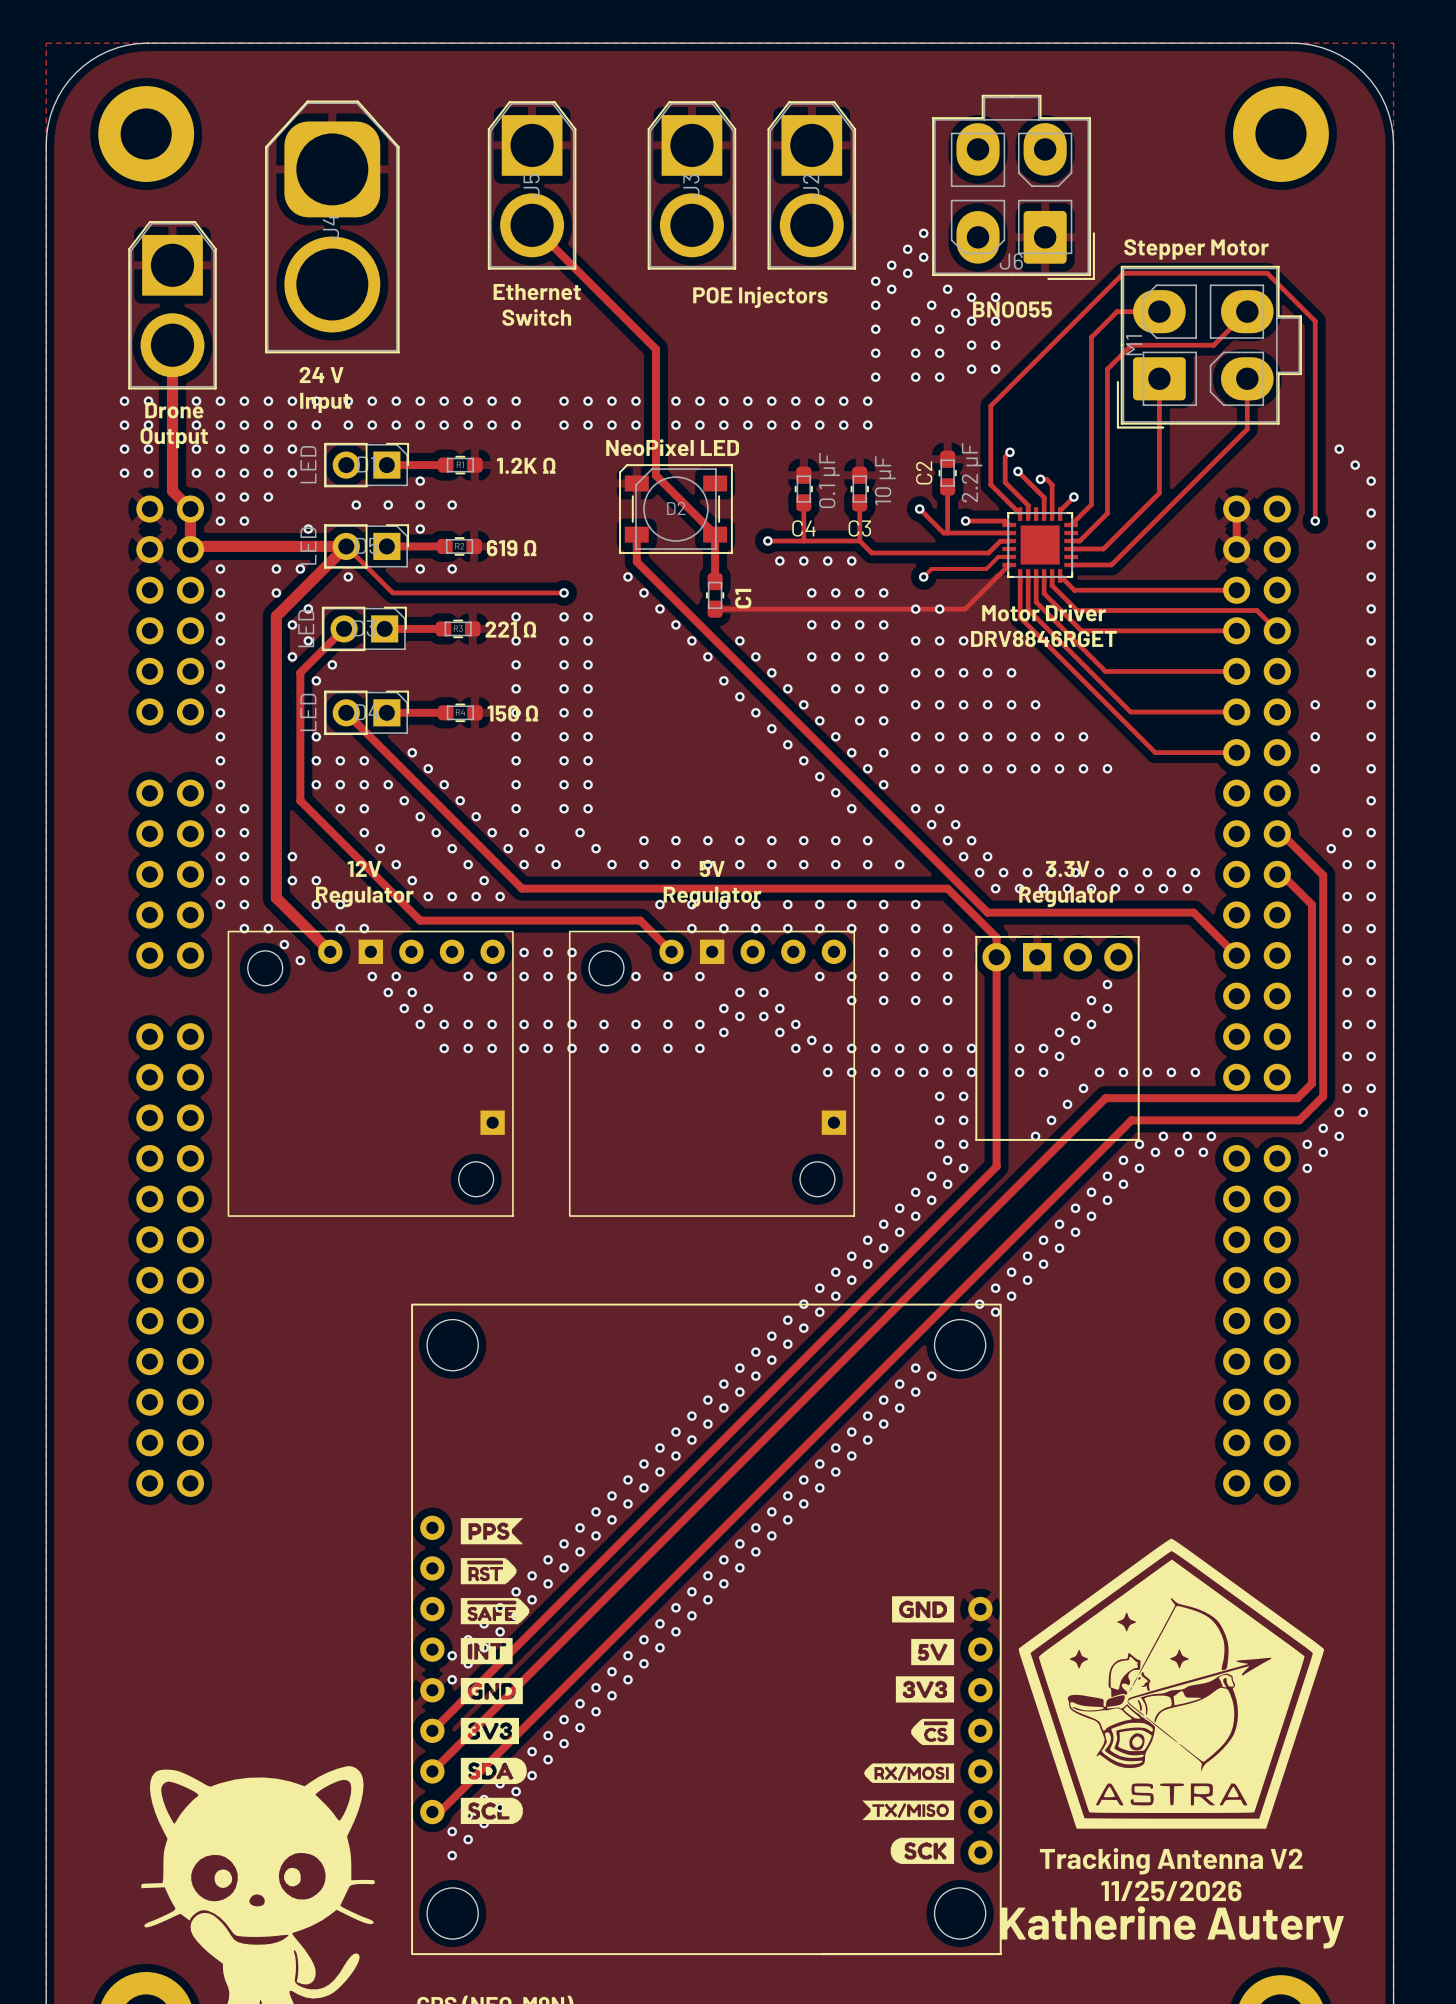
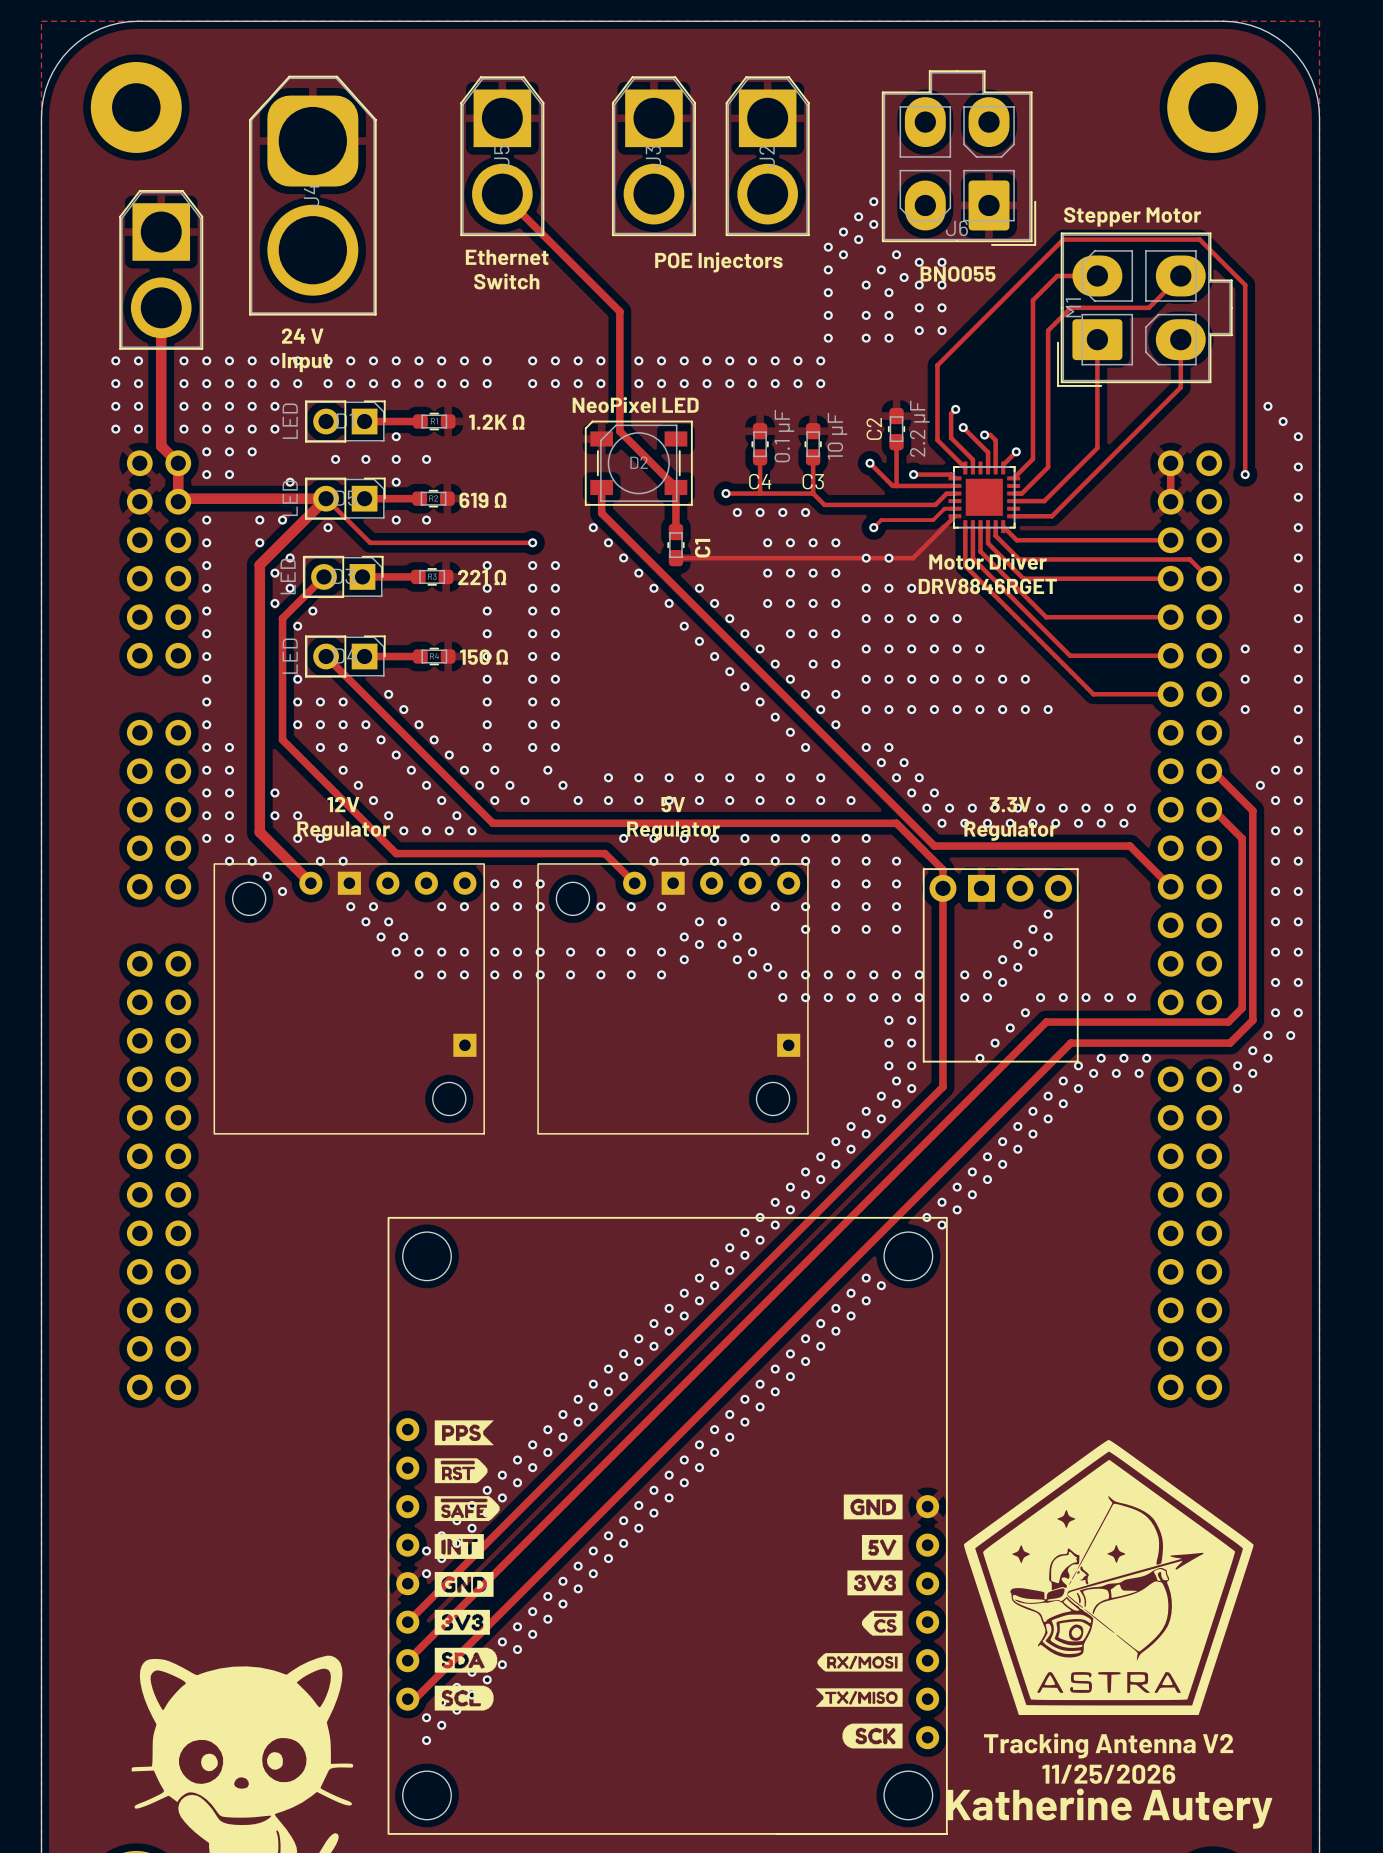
text: Drone (174, 410) -> none
text: Output (174, 438) -> none

